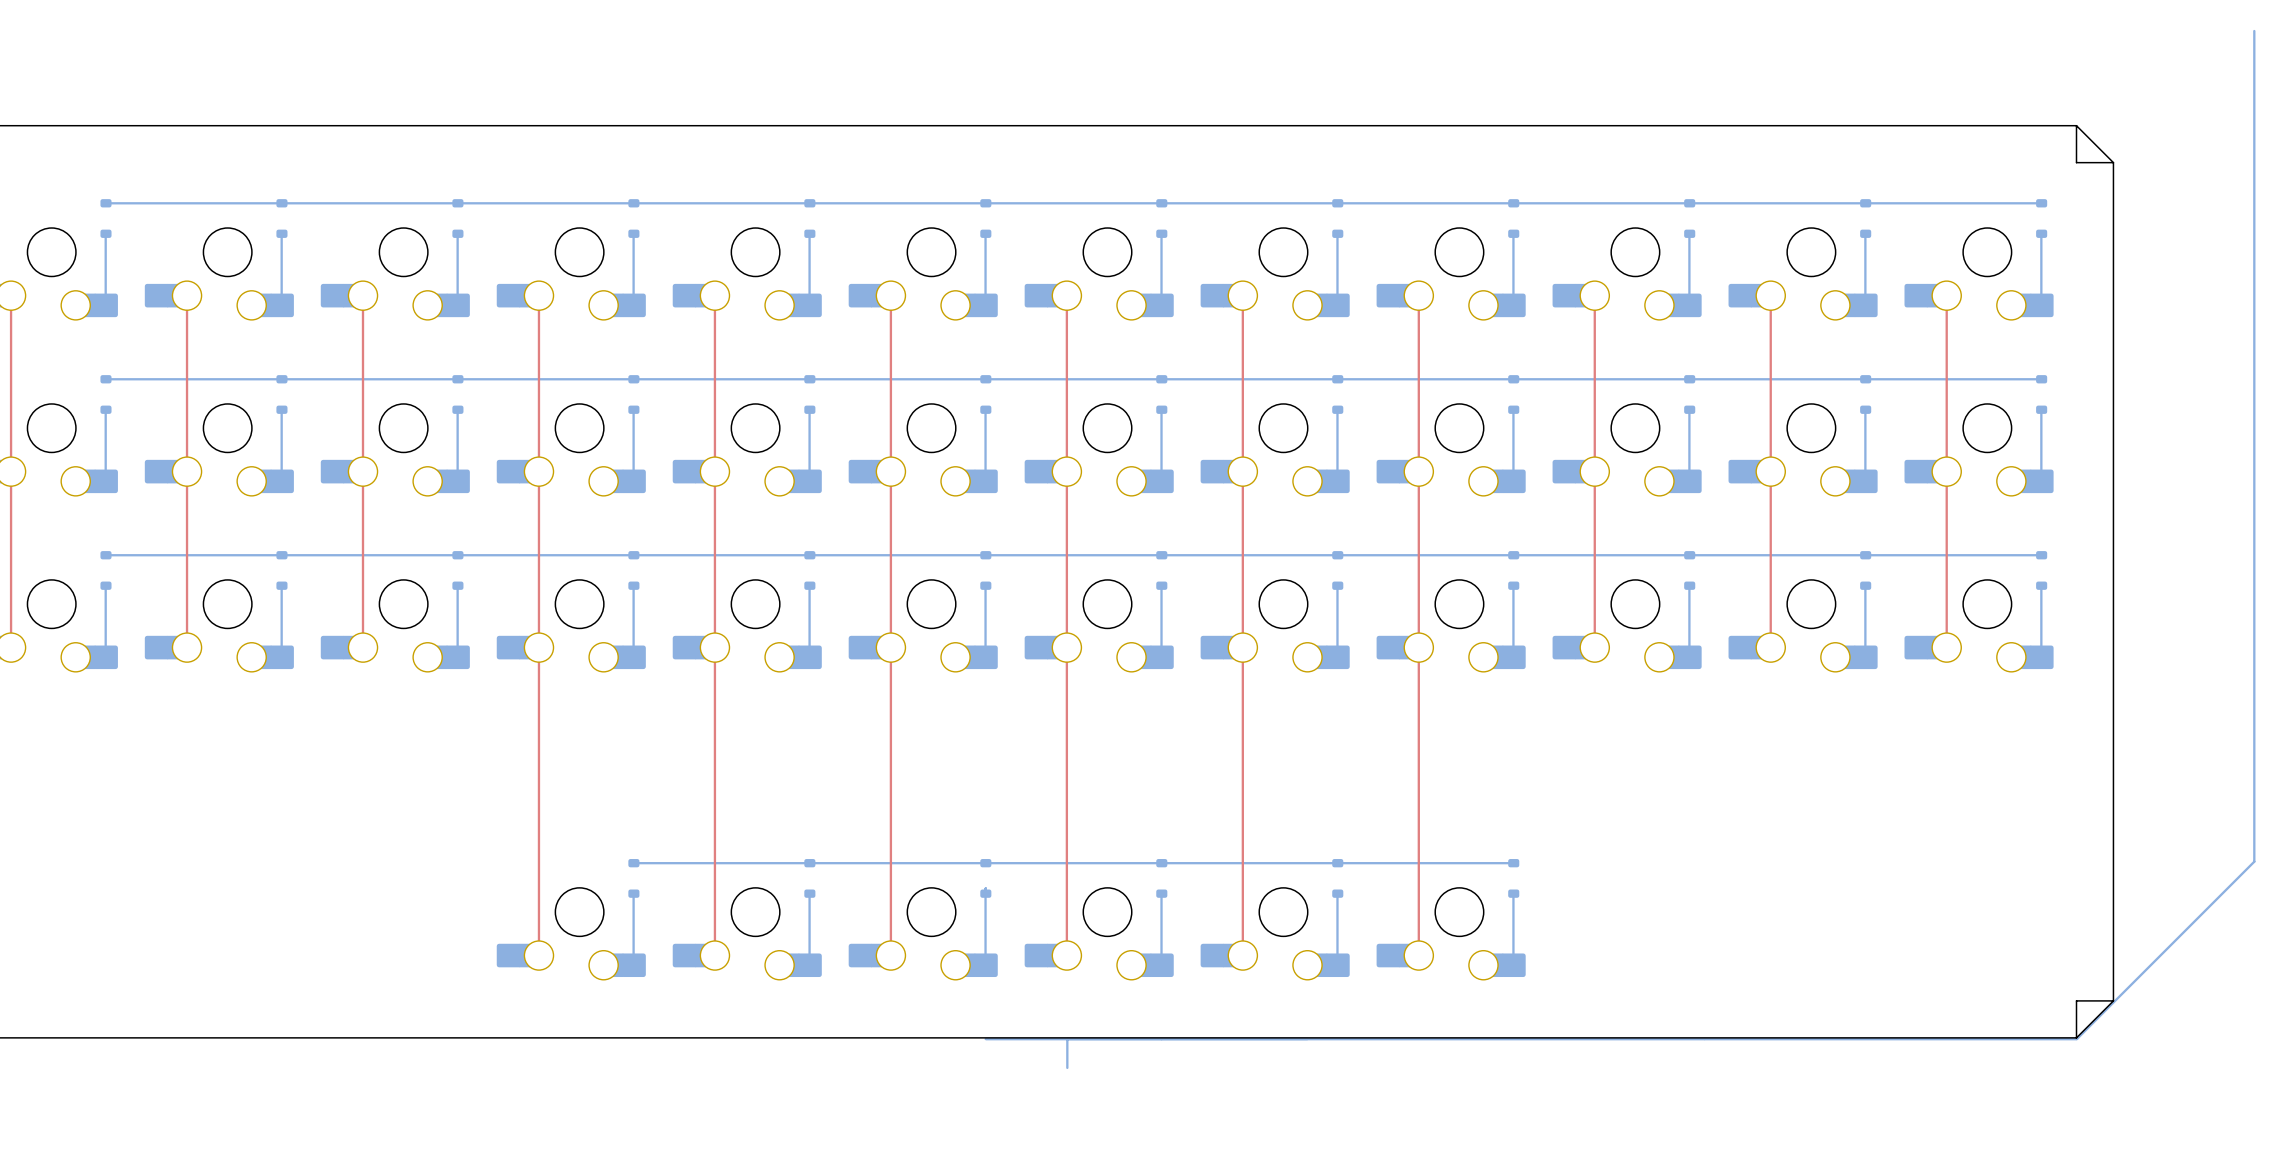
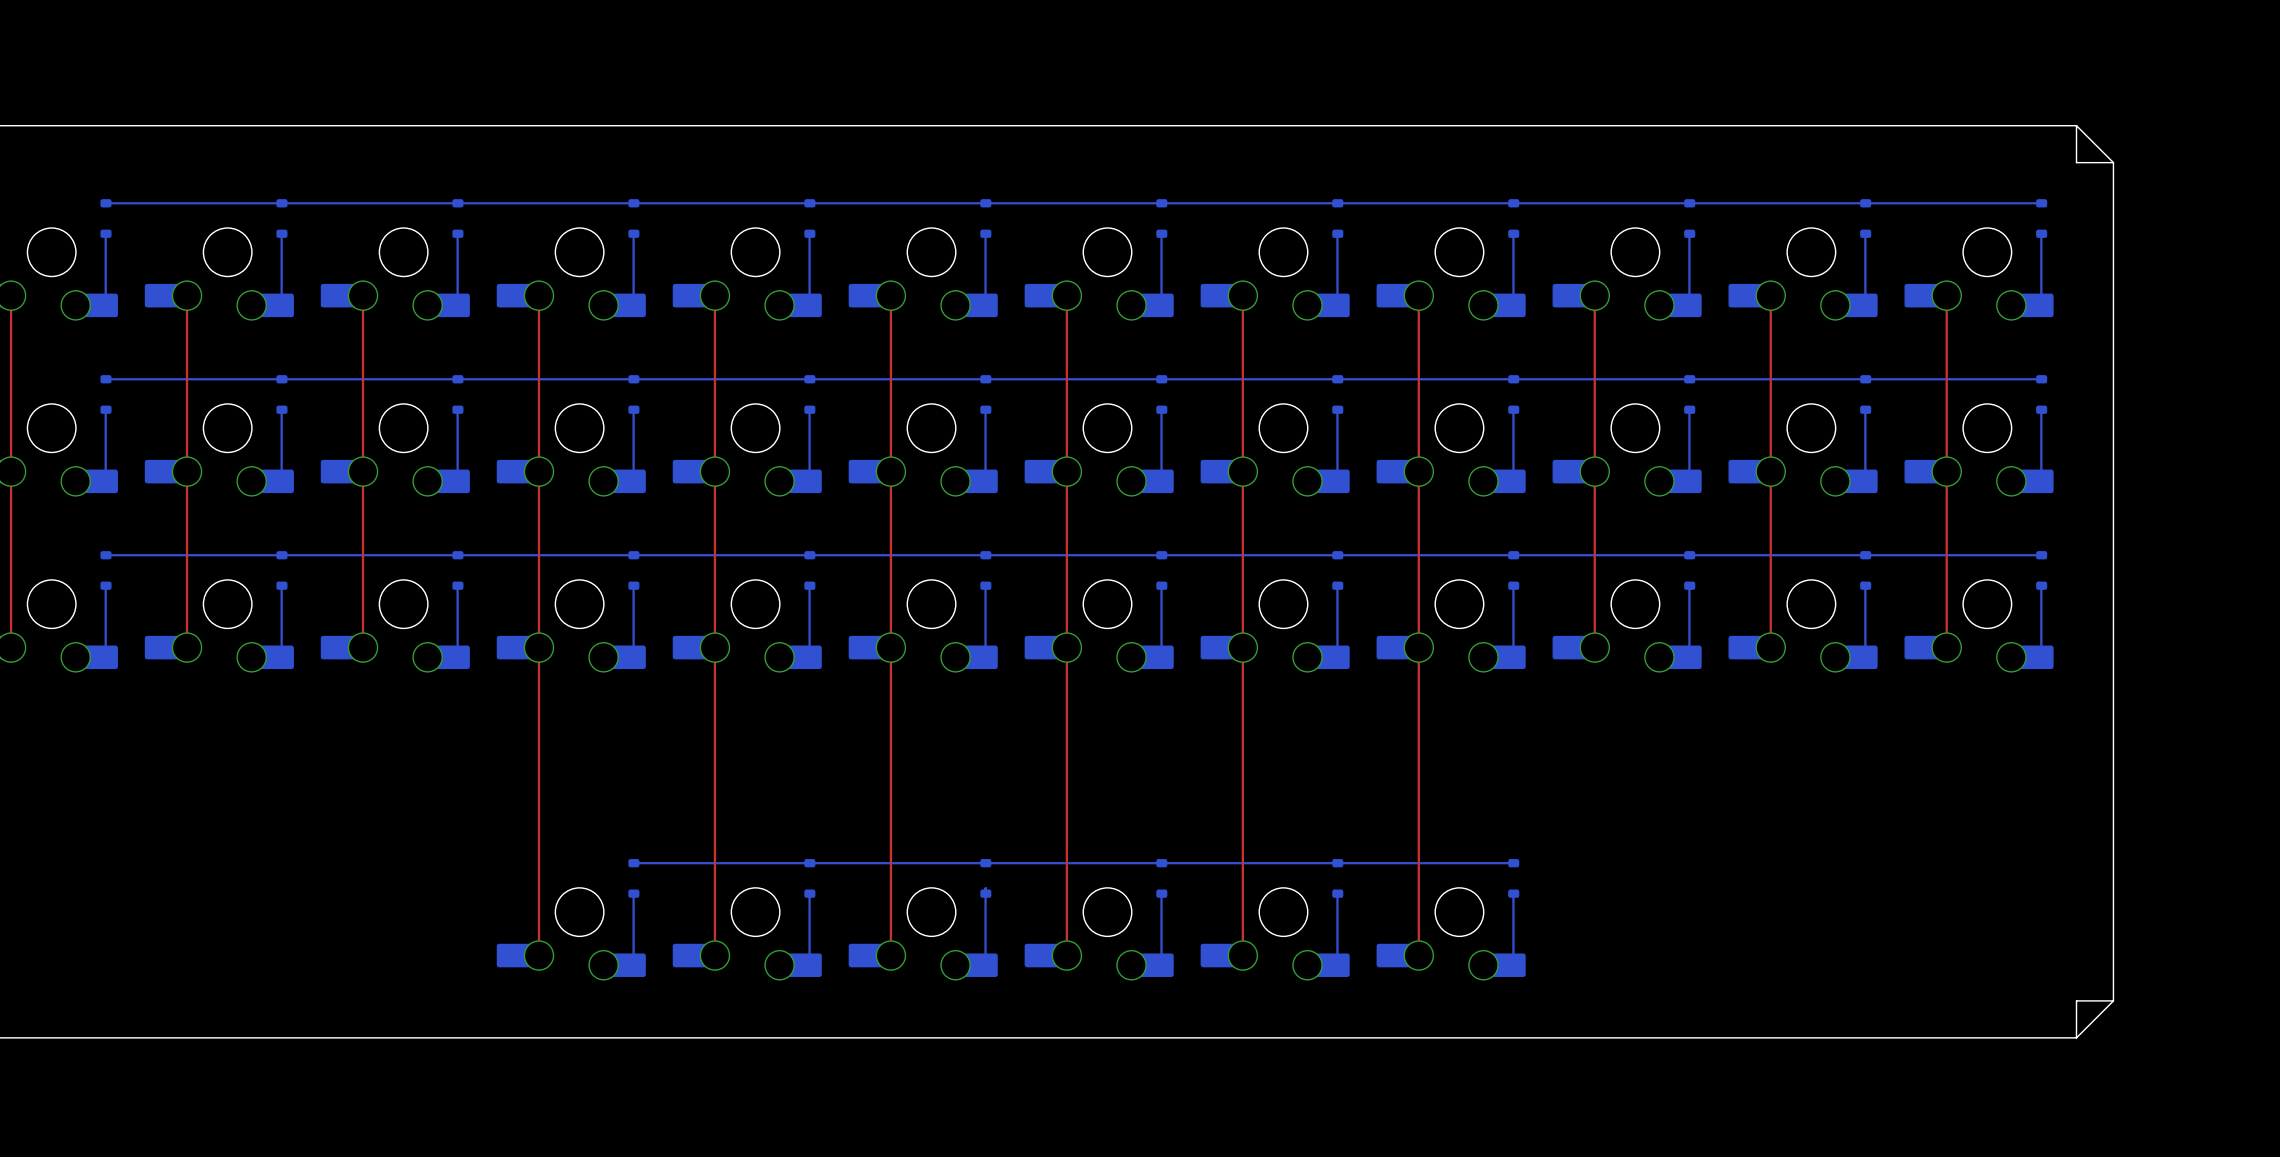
bottom track: (2254, 31) (2254, 861) (2076, 1039) (985, 1039) -> none
bottom track: (1067, 1039) (1067, 1067) -> none

